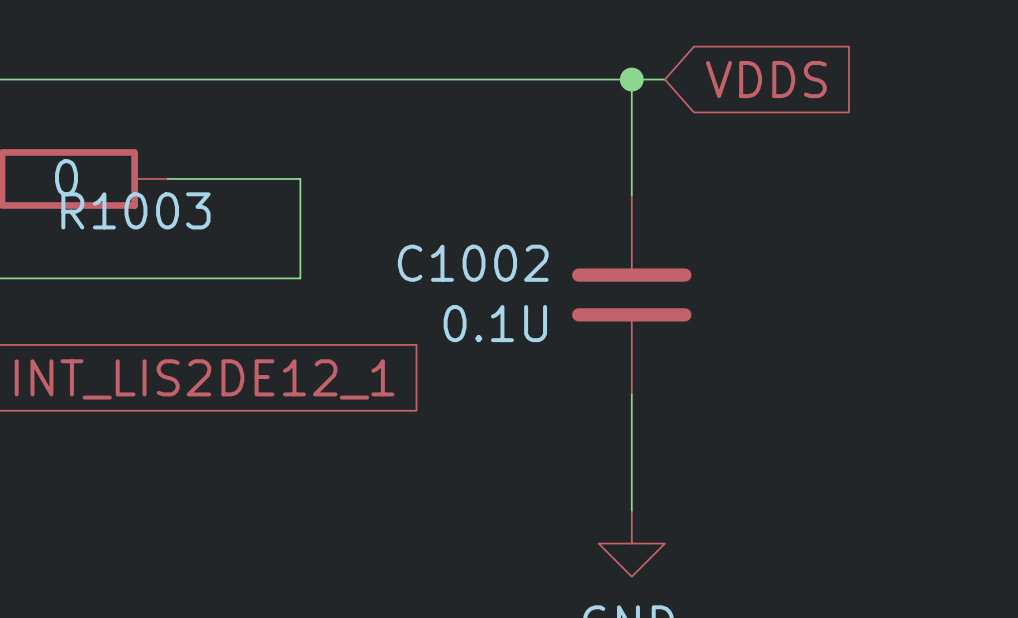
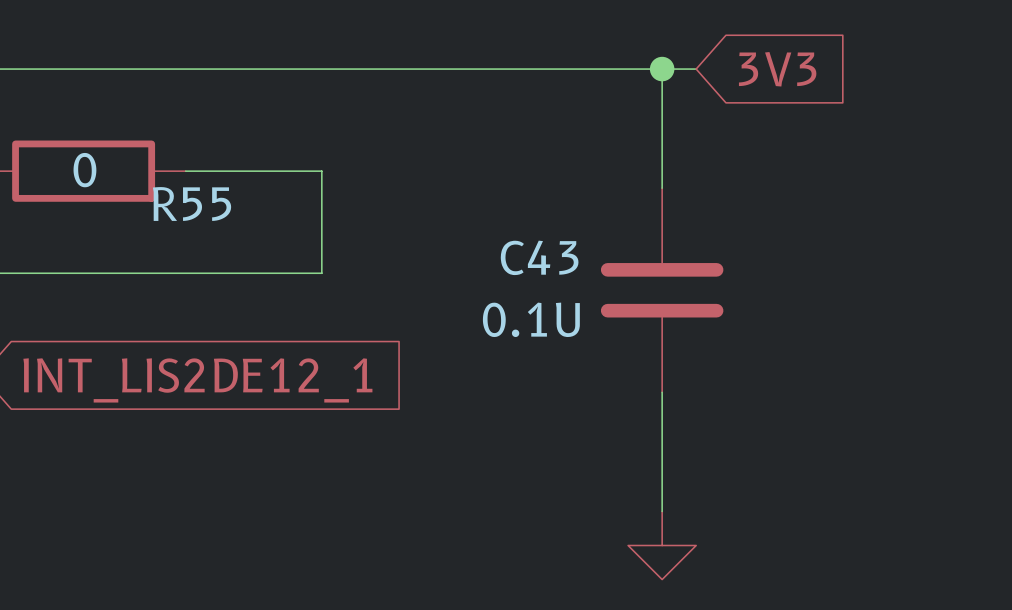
global label: VDDS (766, 79) -> 3V3 (777, 69)
R1003 name: R1003 (135, 210) -> R55 (192, 204)
C1002 name: C1002 (473, 263) -> C43 (539, 257)

